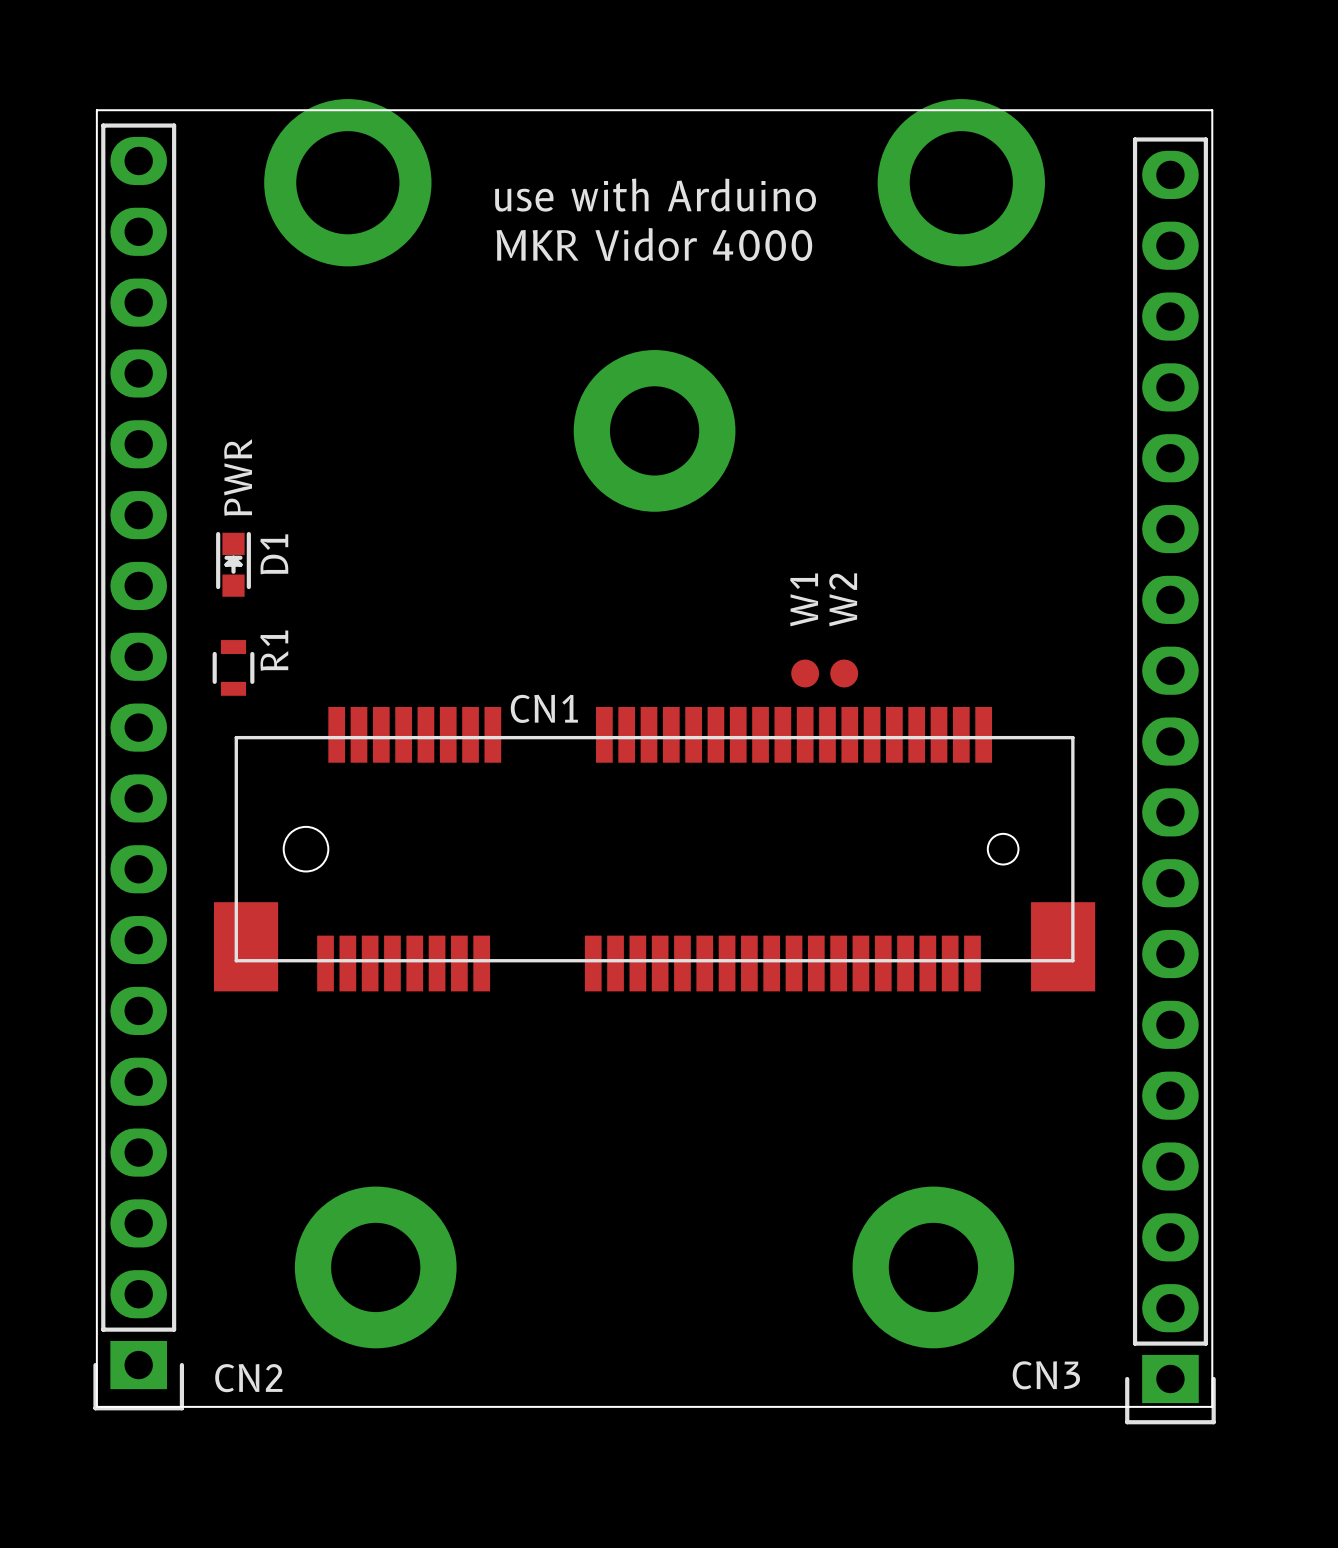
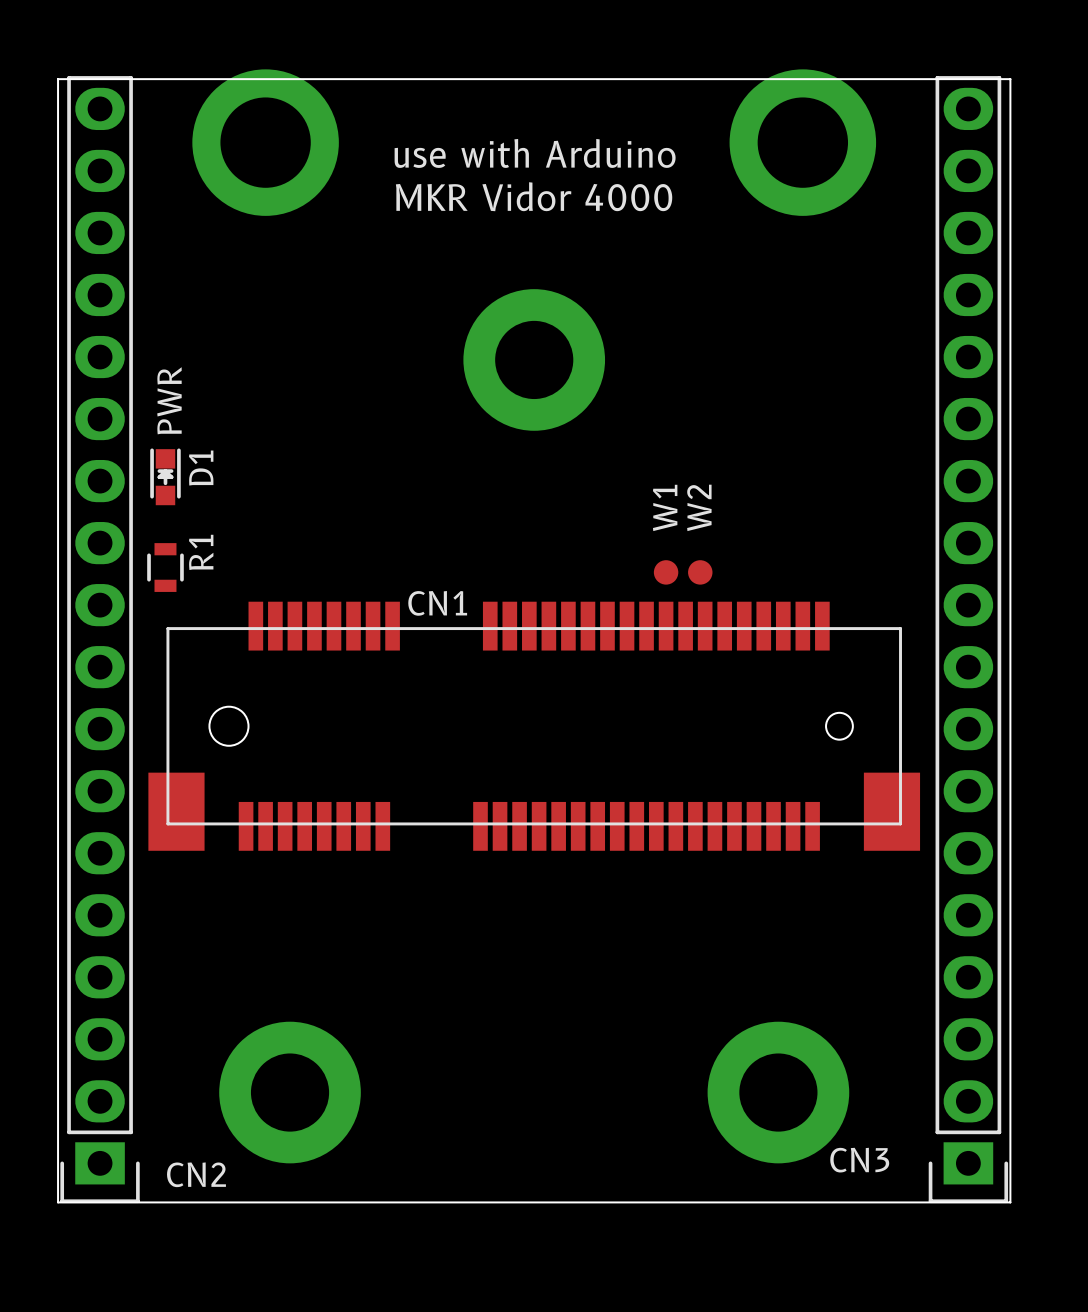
board edge: (110, 110) (96, 110) (96, 1406) (1212, 1406) (1212, 110) (1198, 110) -> (58, 79) (58, 1202) (1010, 1202) (1010, 79)
CN2 position: (138, 766) -> (100, 639)
CN3 position: (1170, 780) -> (968, 639)

